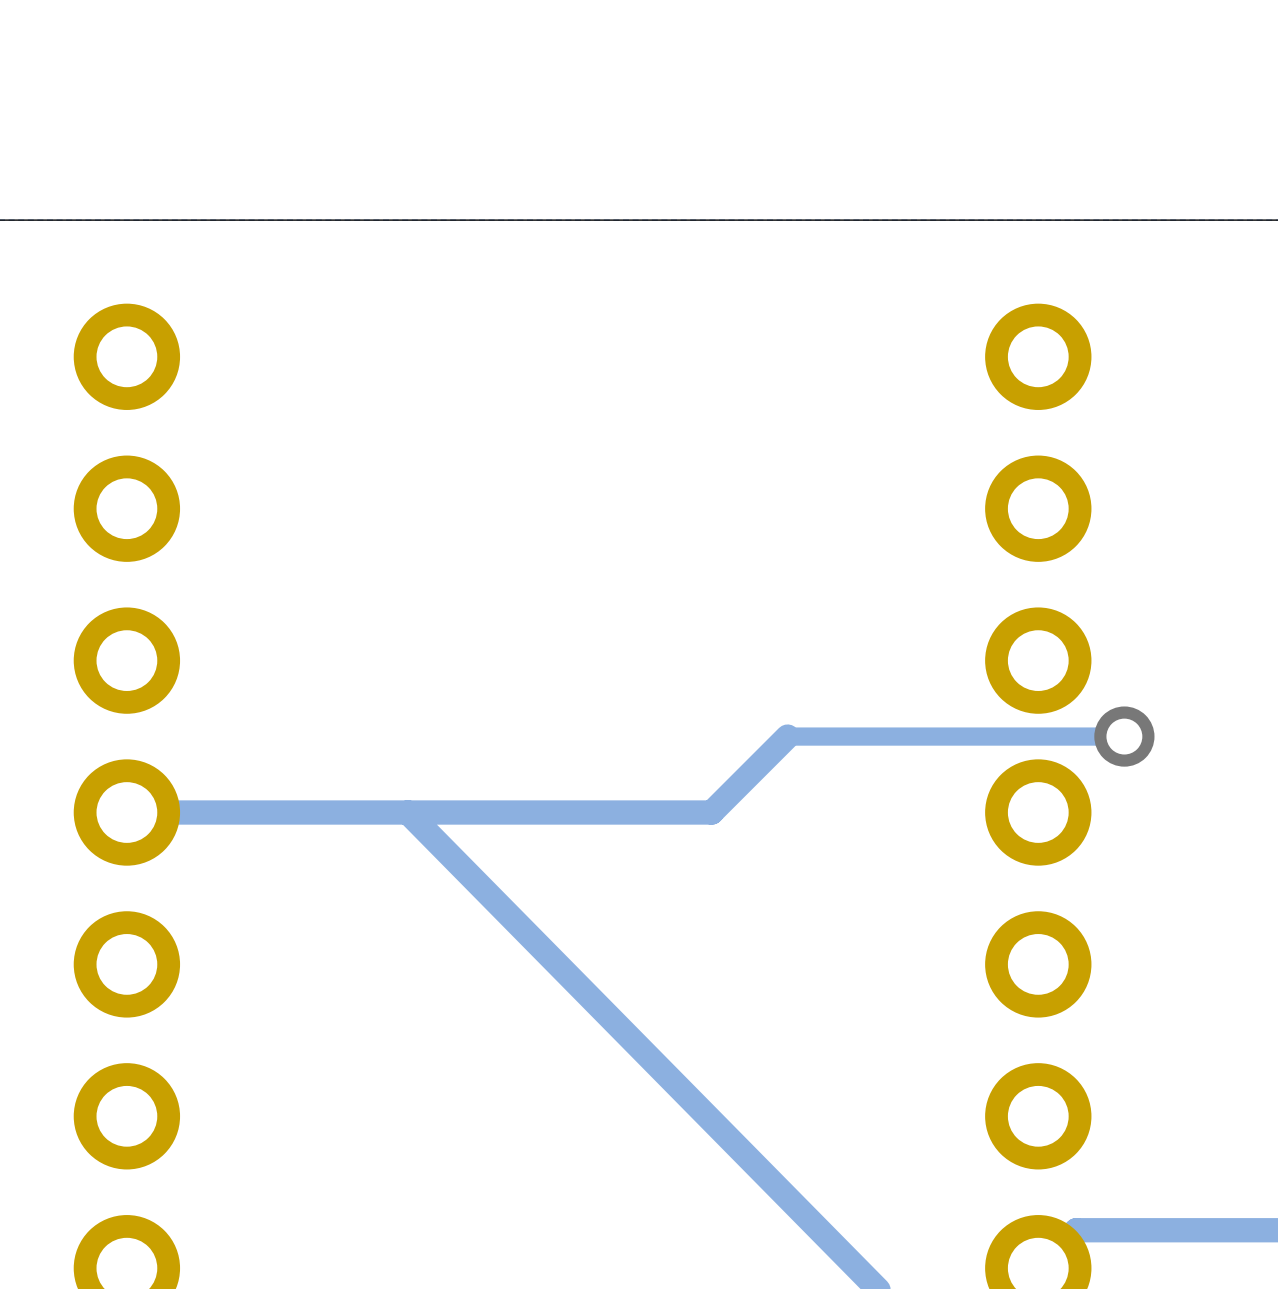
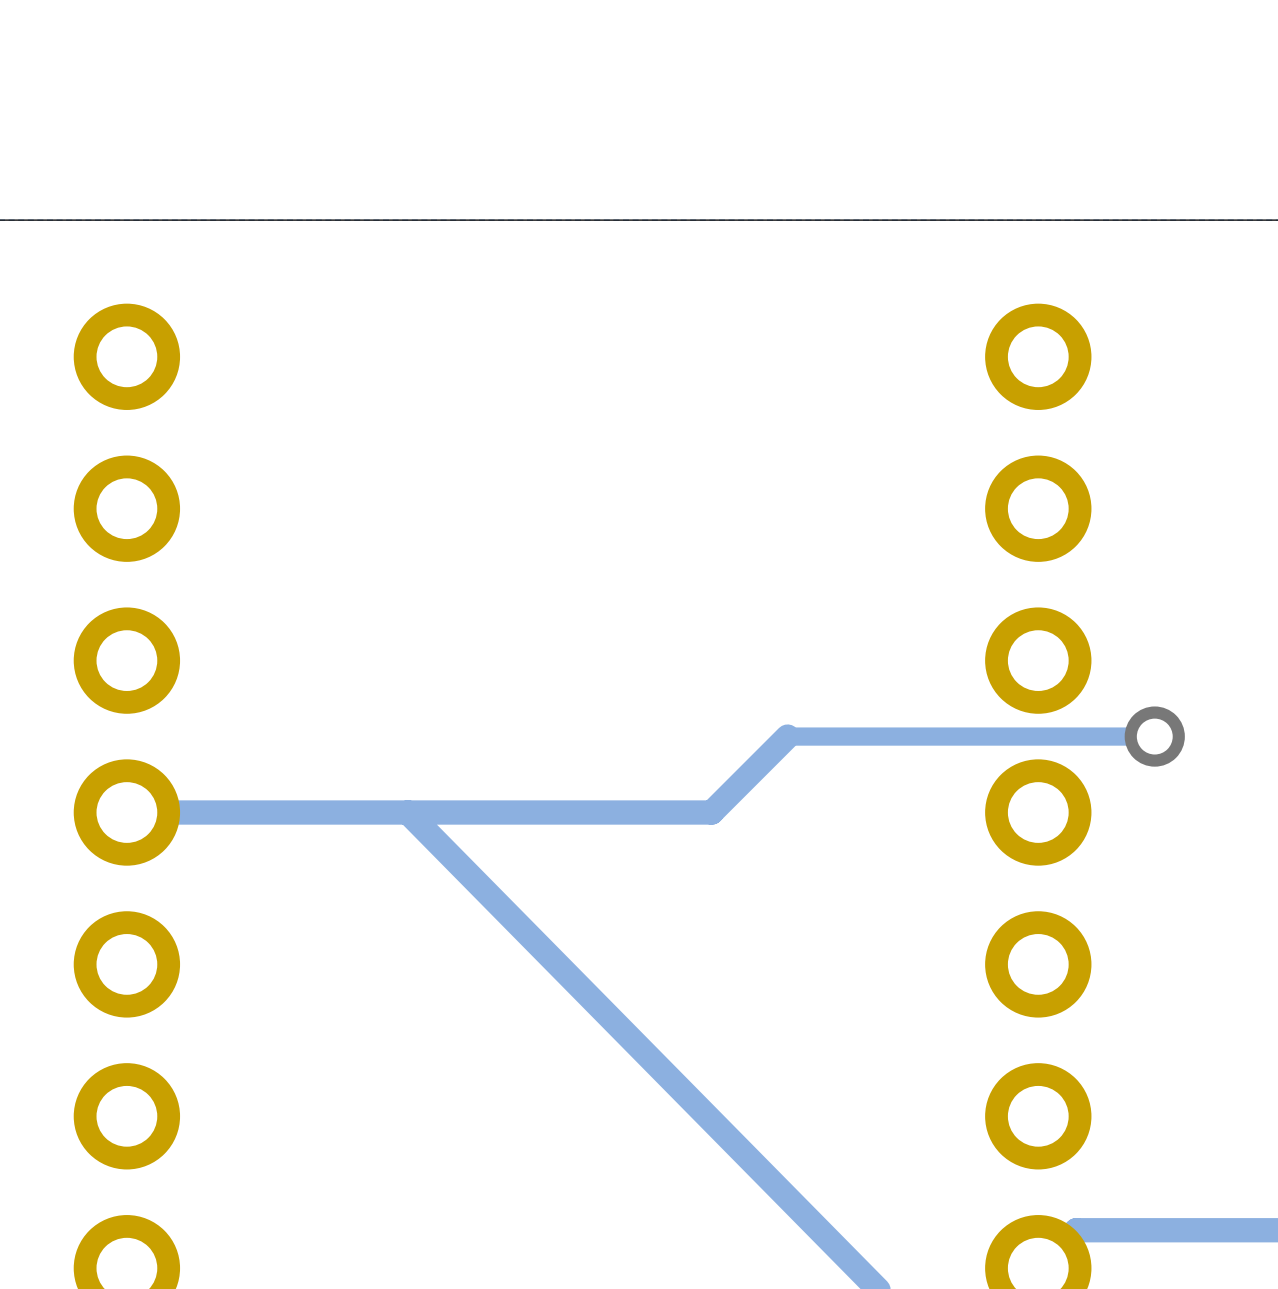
via position: (1124, 736) -> (1154, 736)

